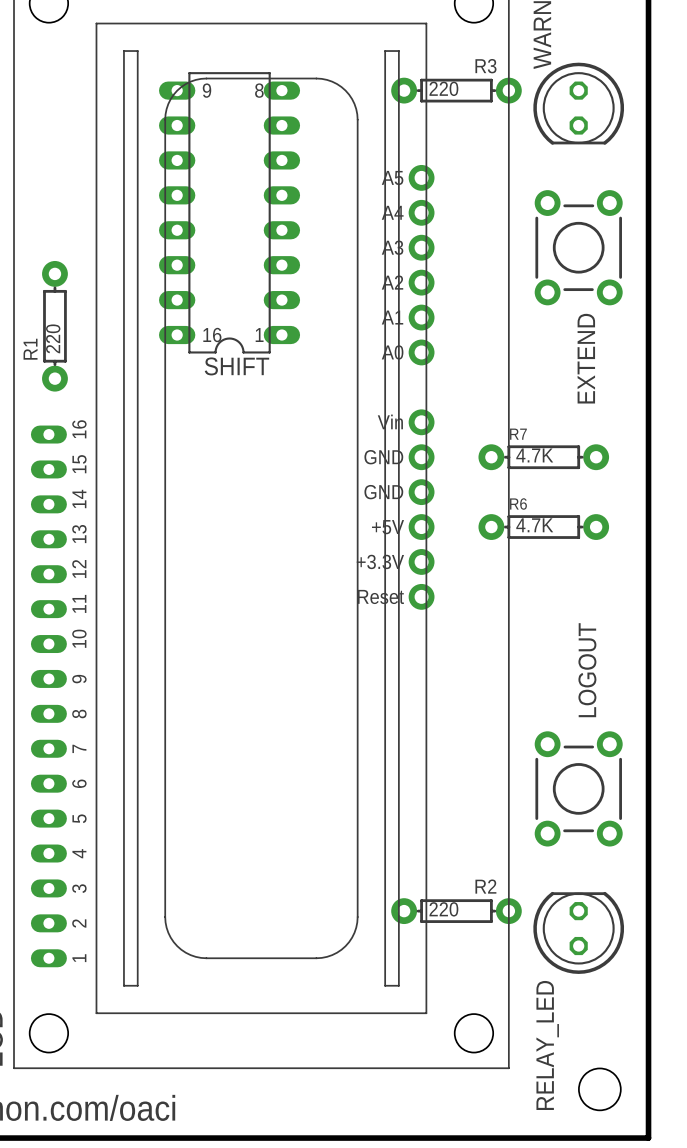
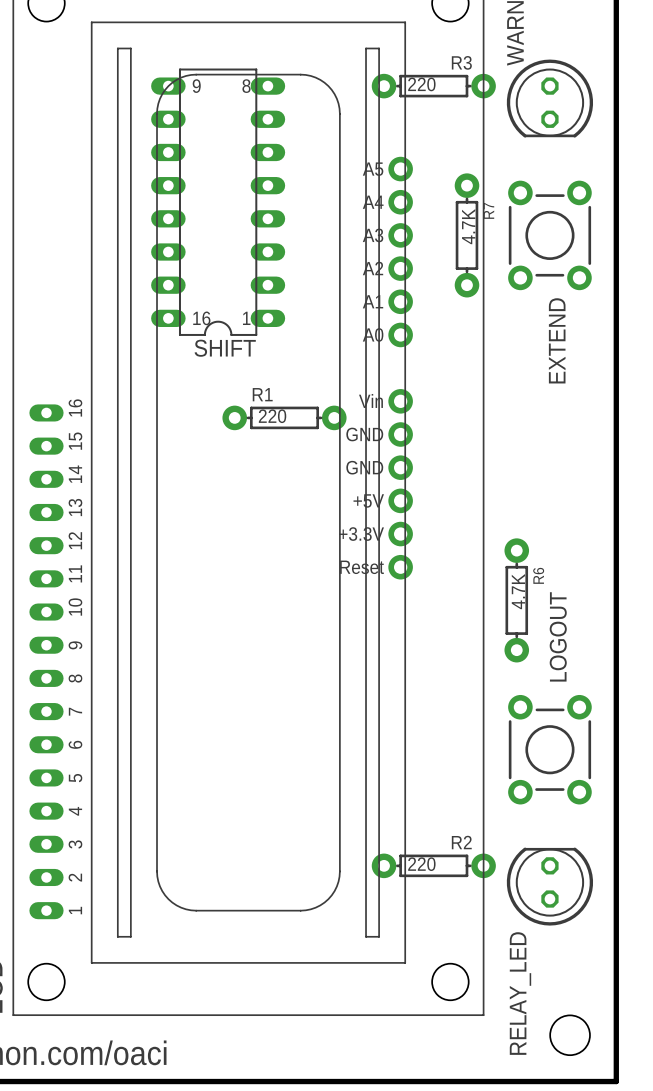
R1 rotation: 0° (54, 326) -> 90° clockwise (284, 417)
R1 position: (54, 326) -> (284, 417)
R7 rotation: 0° (543, 457) -> 90° clockwise (466, 235)
R7 position: (543, 457) -> (466, 235)
R6 rotation: 0° (543, 527) -> 90° clockwise (516, 600)
R6 position: (543, 527) -> (516, 600)

